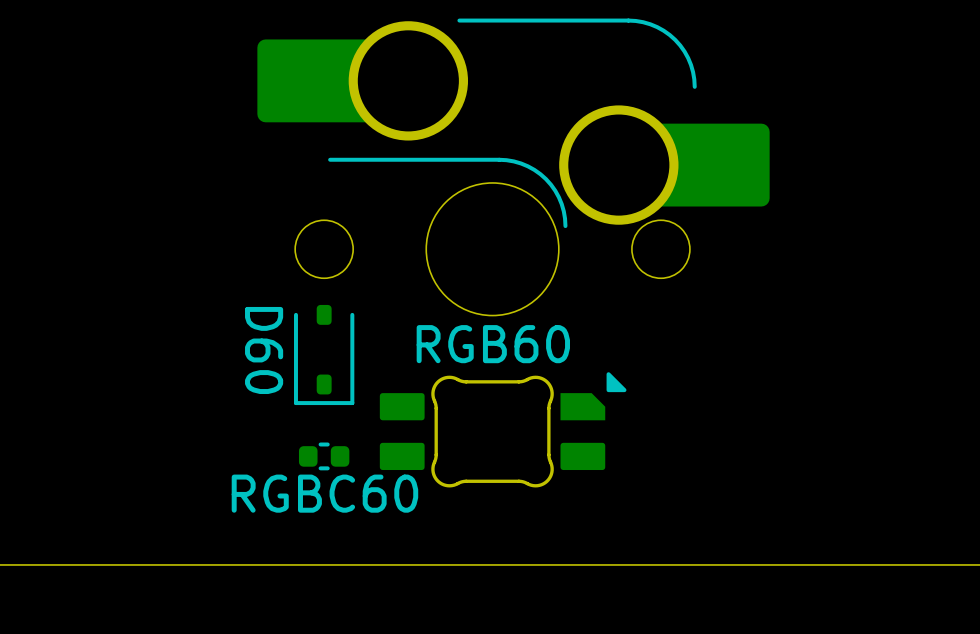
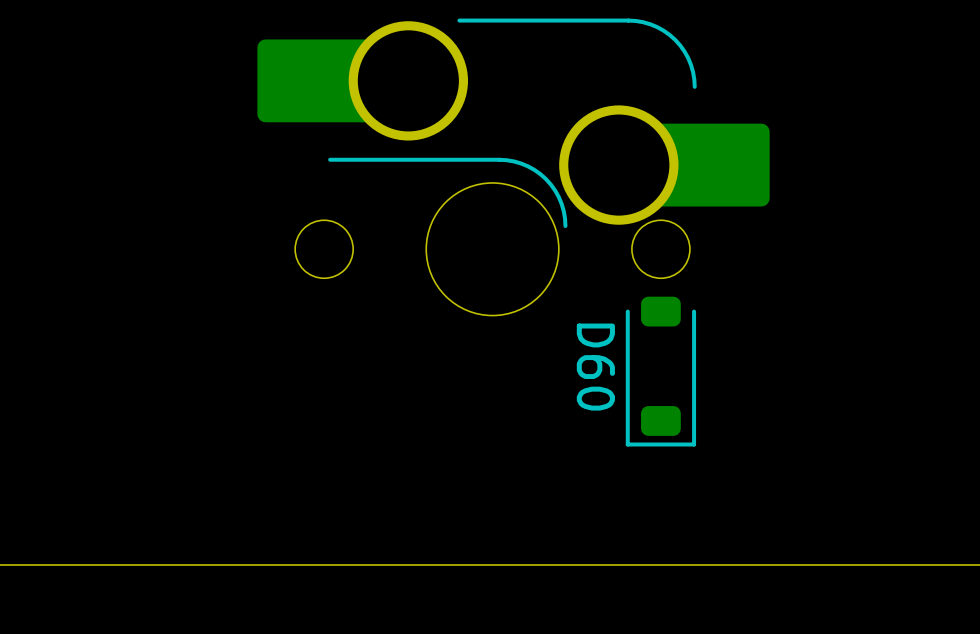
D60 footprint: [293, 304, 355, 406] -> [625, 296, 697, 447]
RGB60: (503, 429) -> none
RGBC60: (324, 456) -> none

